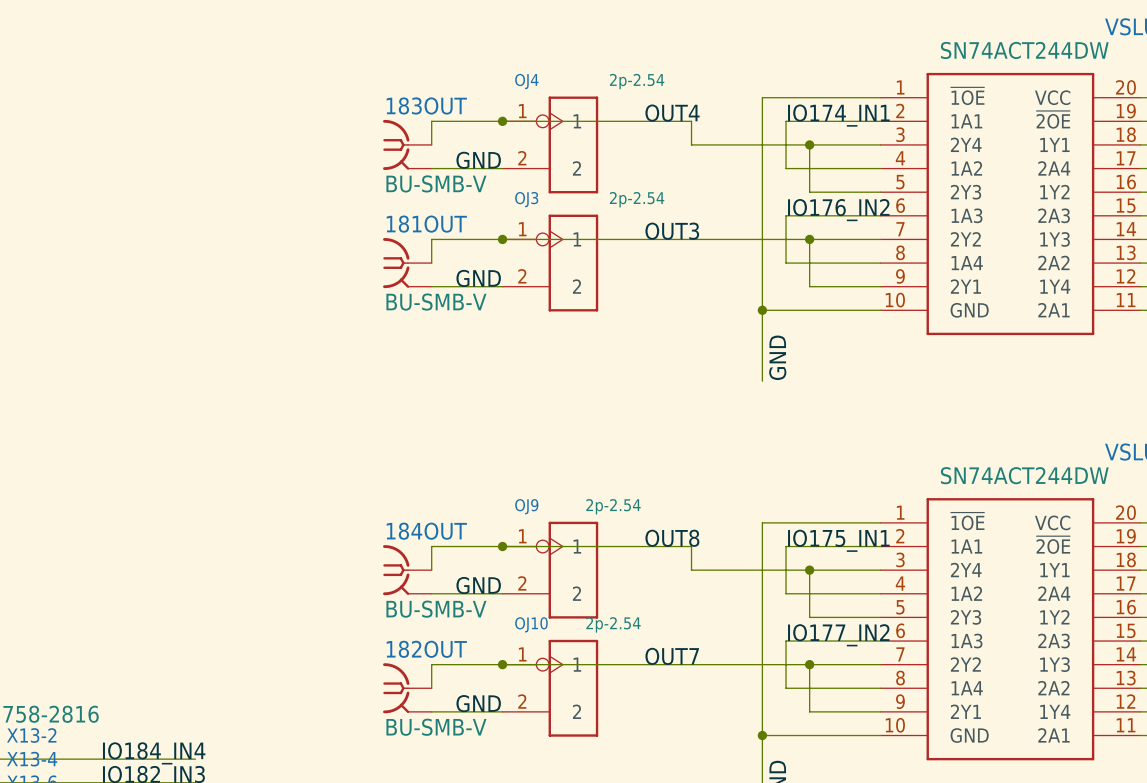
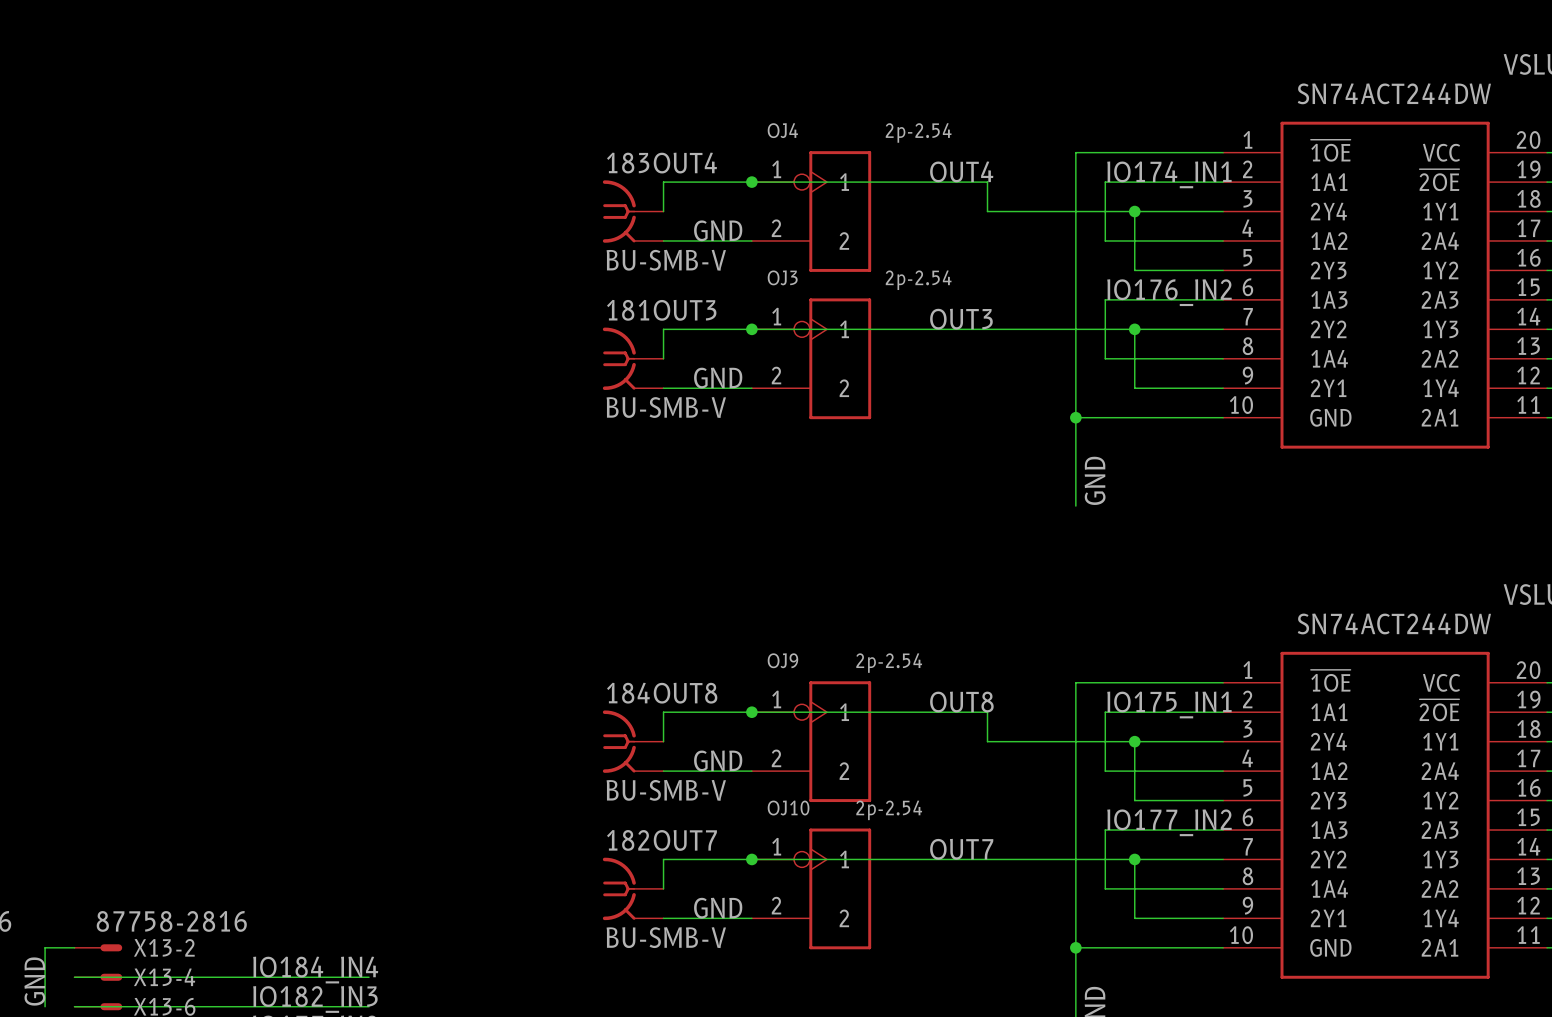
183OUT name: 183OUT (426, 105) -> 183OUT4 (661, 163)
181OUT name: 181OUT (426, 224) -> 181OUT3 (661, 310)
184OUT name: 184OUT (426, 531) -> 184OUT8 (662, 693)
182OUT name: 182OUT (426, 649) -> 182OUT7 (661, 840)

